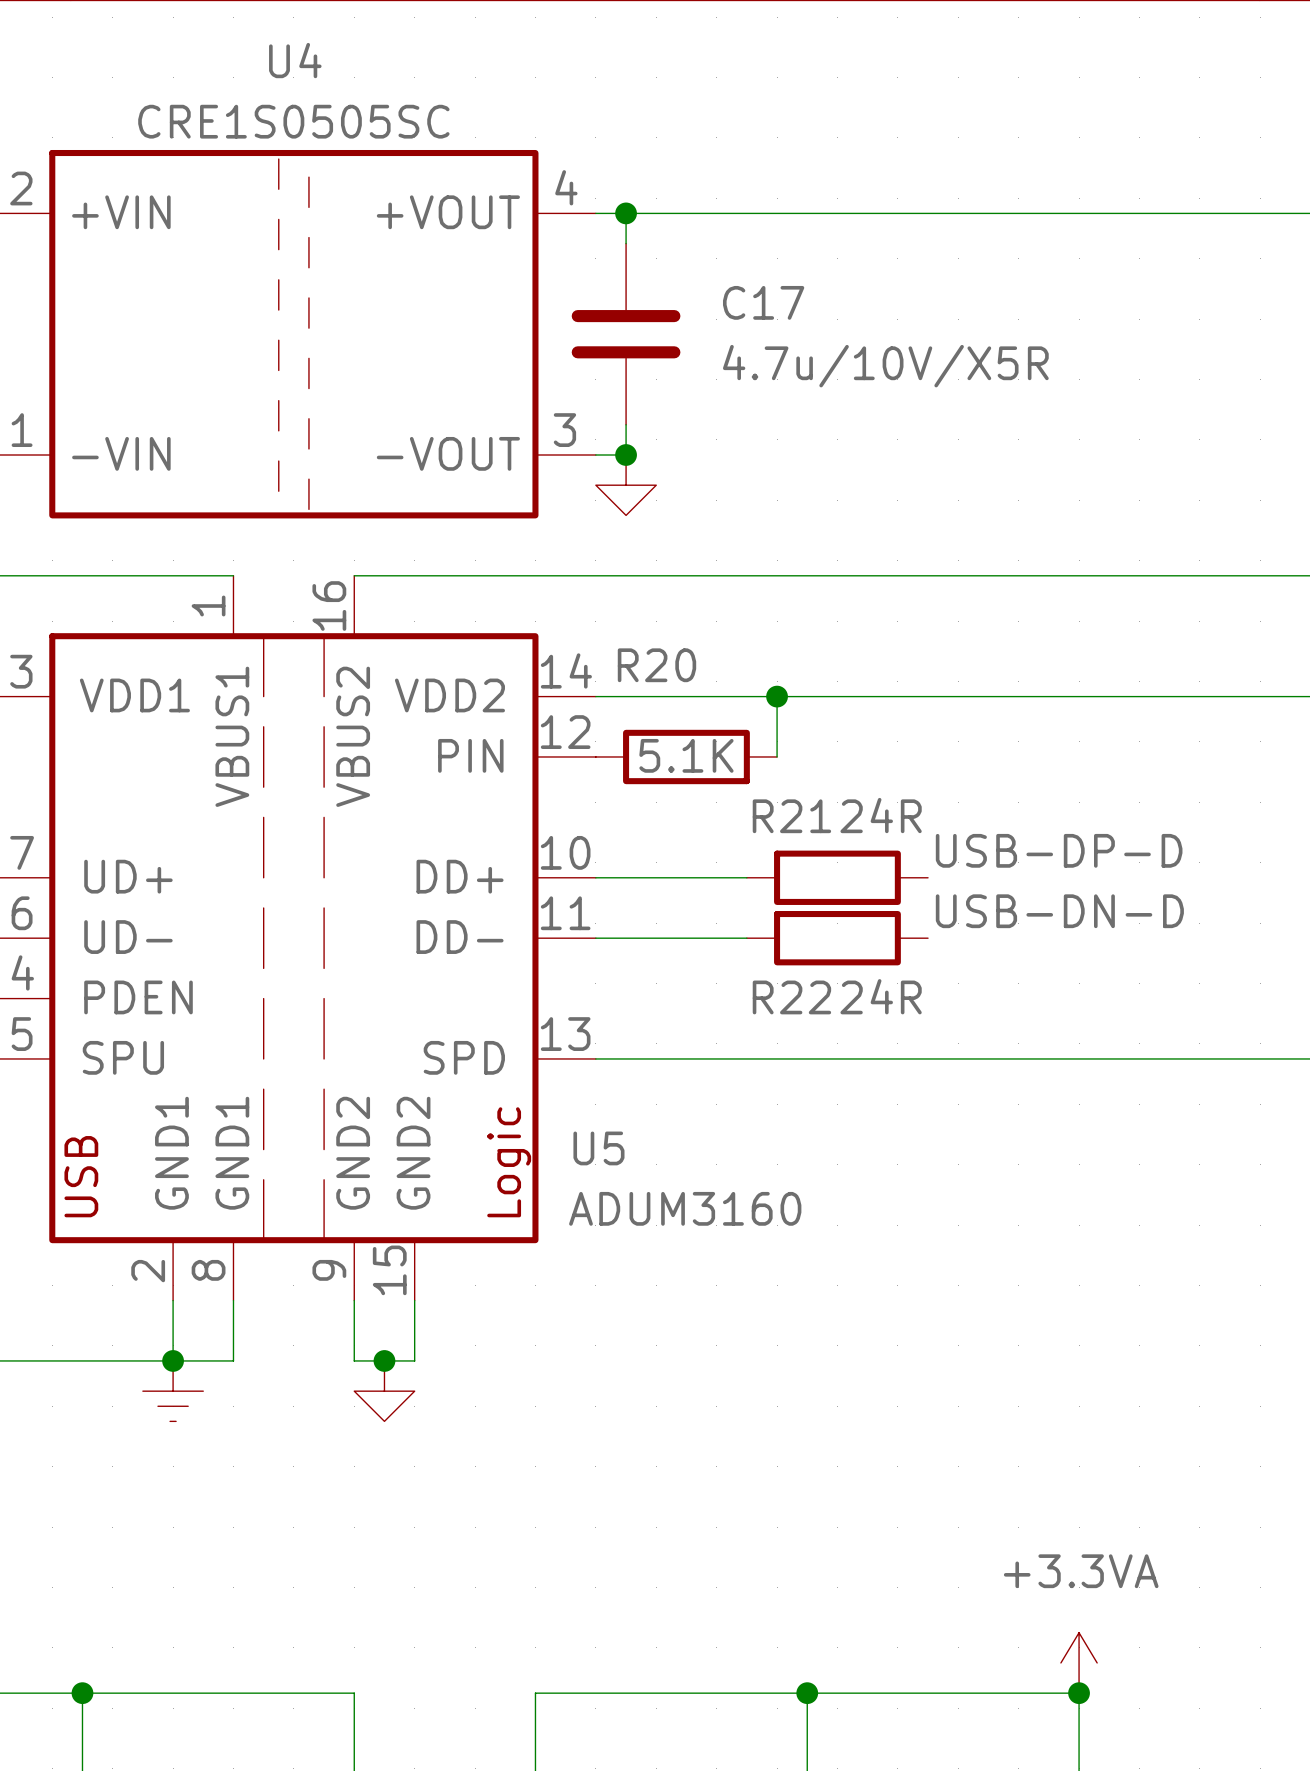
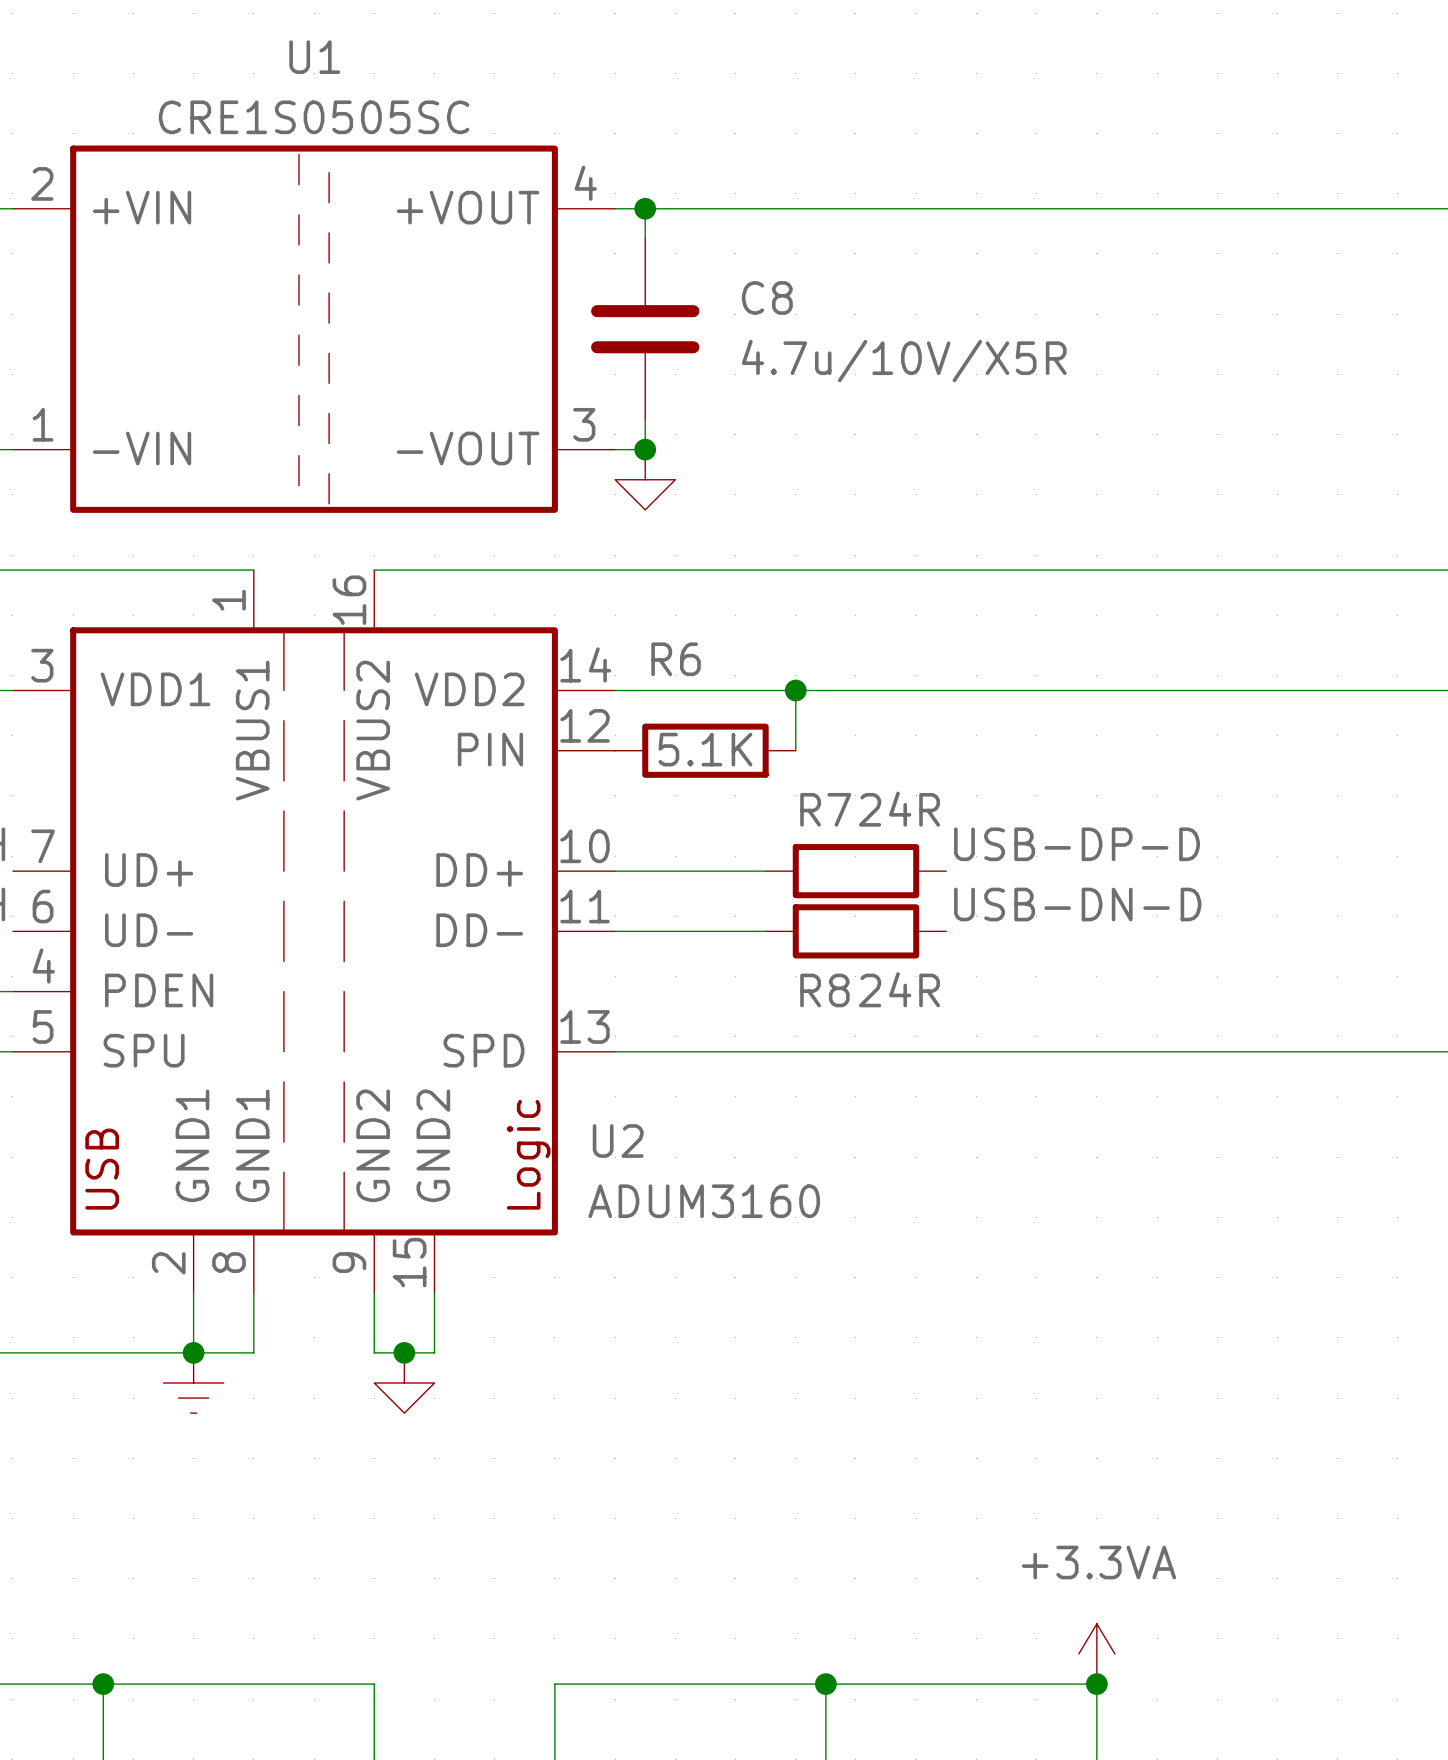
U4 name: U4 (295, 60) -> U1 (314, 57)
C17 name: C17 (763, 302) -> C8 (767, 297)
R20 name: R20 (656, 665) -> R6 (676, 659)
R21 name: R21 (791, 816) -> R7 (825, 809)
R22 name: R22 (791, 997) -> R8 (824, 990)
U5 name: U5 (598, 1148) -> U2 (618, 1141)

